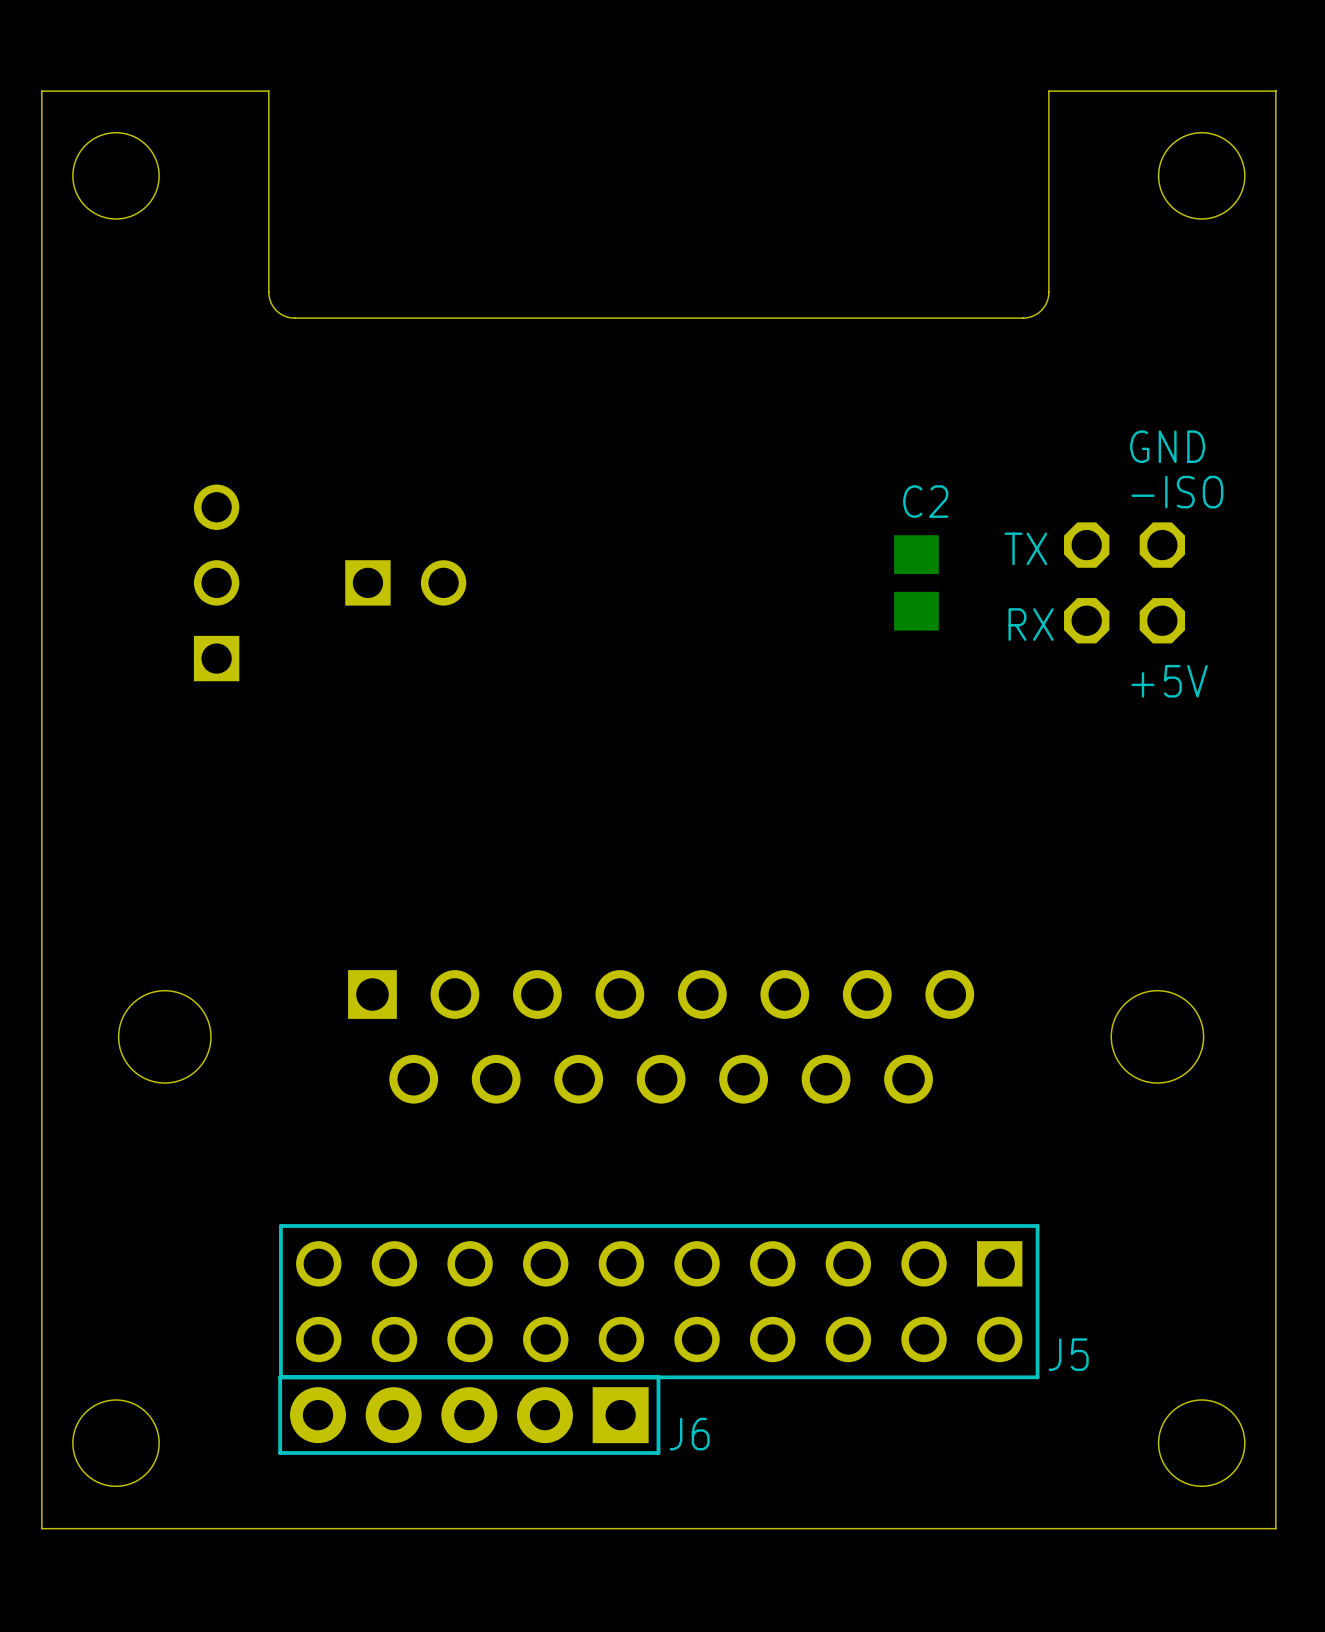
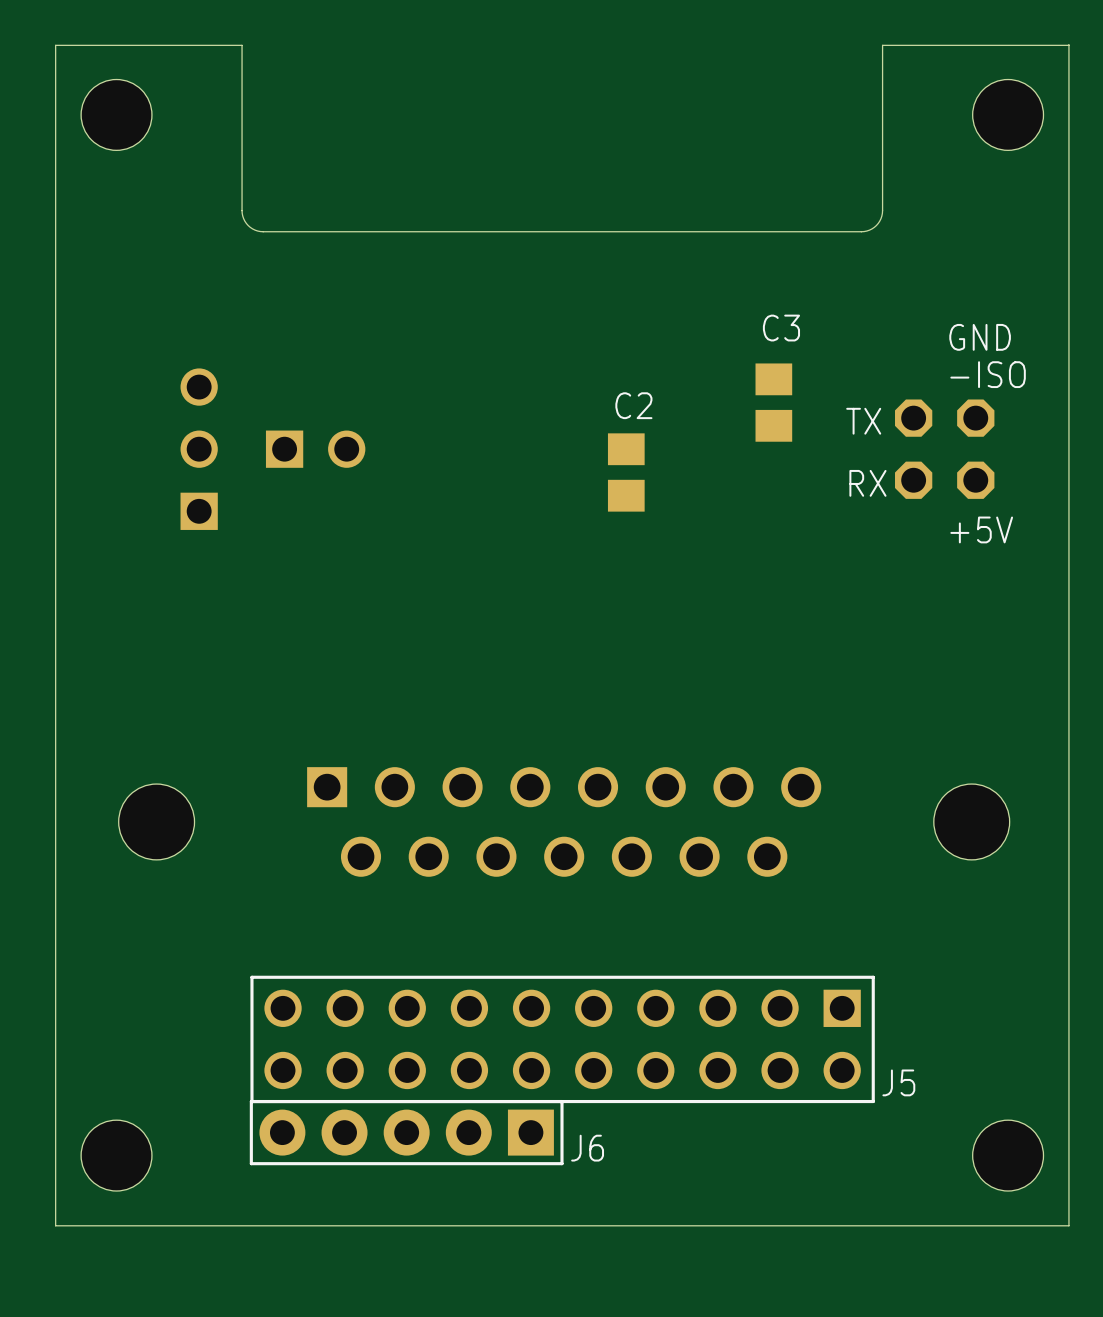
C3: none -> (773, 402)
part position: (405, 582) -> (315, 449)
C2 position: (916, 582) -> (626, 472)

